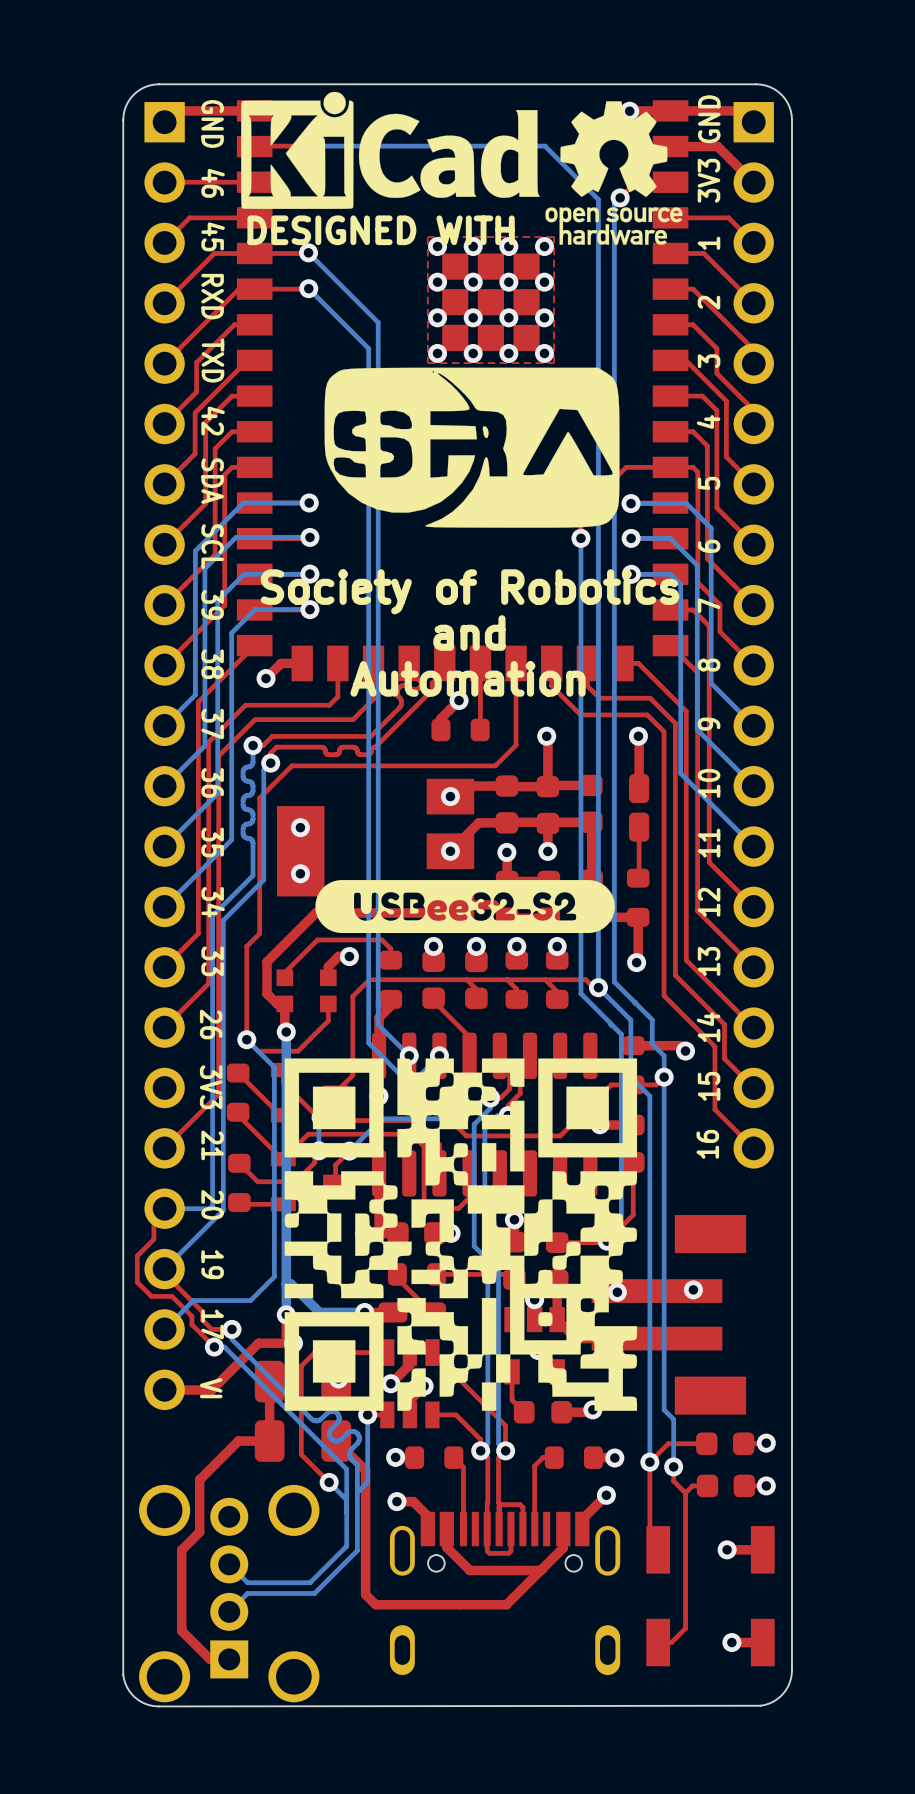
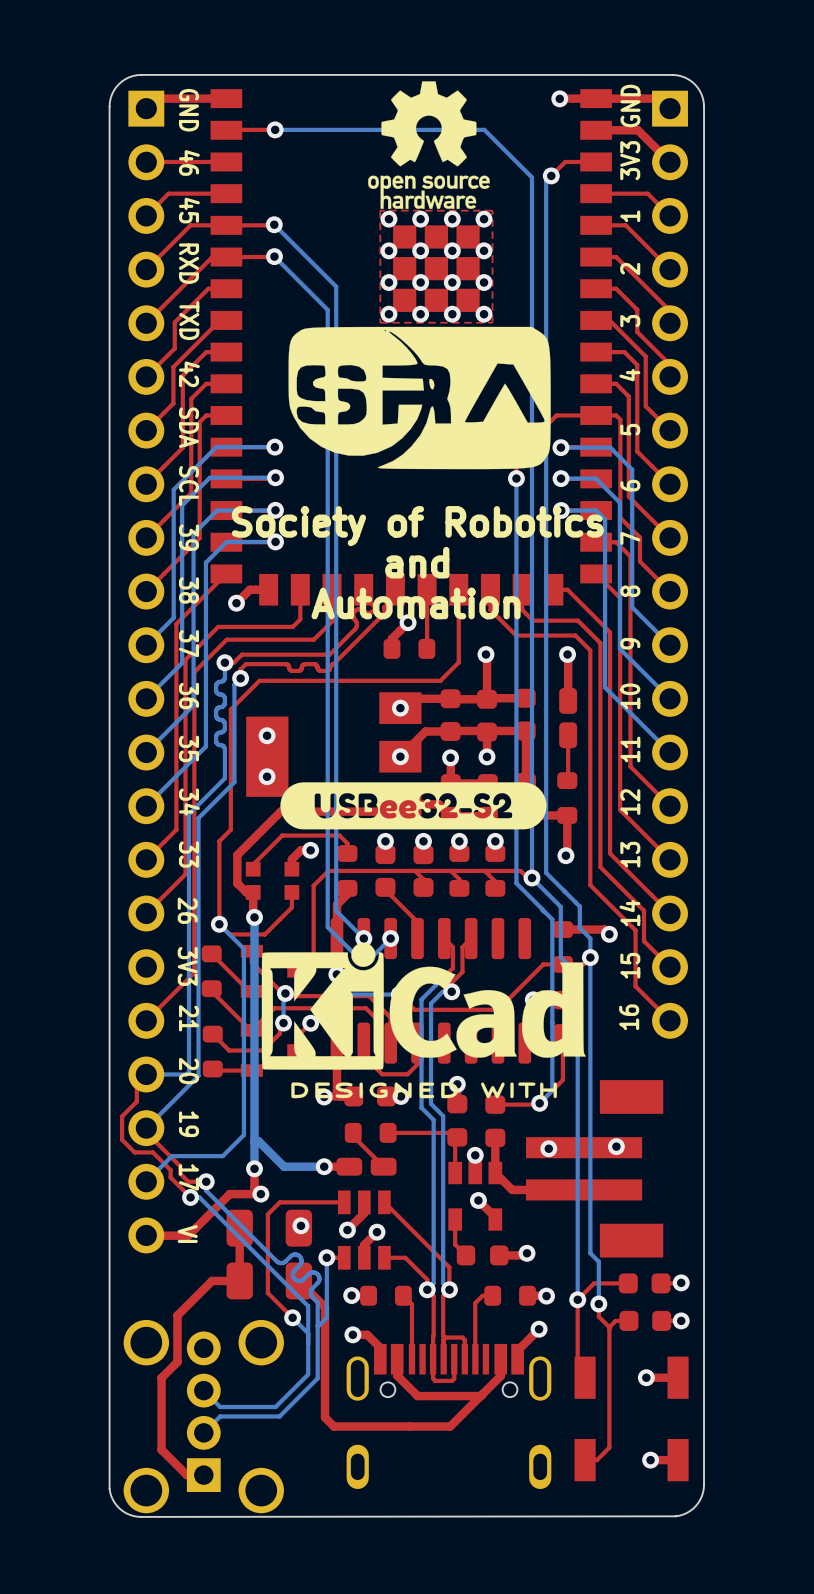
drawing: [241, 91, 540, 209] -> none
drawing position: (613, 173) -> (428, 145)
text: DESIGNED WITH (381, 230) -> none
drawing: [284, 1058, 638, 1411] -> none
drawing: none -> [261, 942, 587, 1099]

